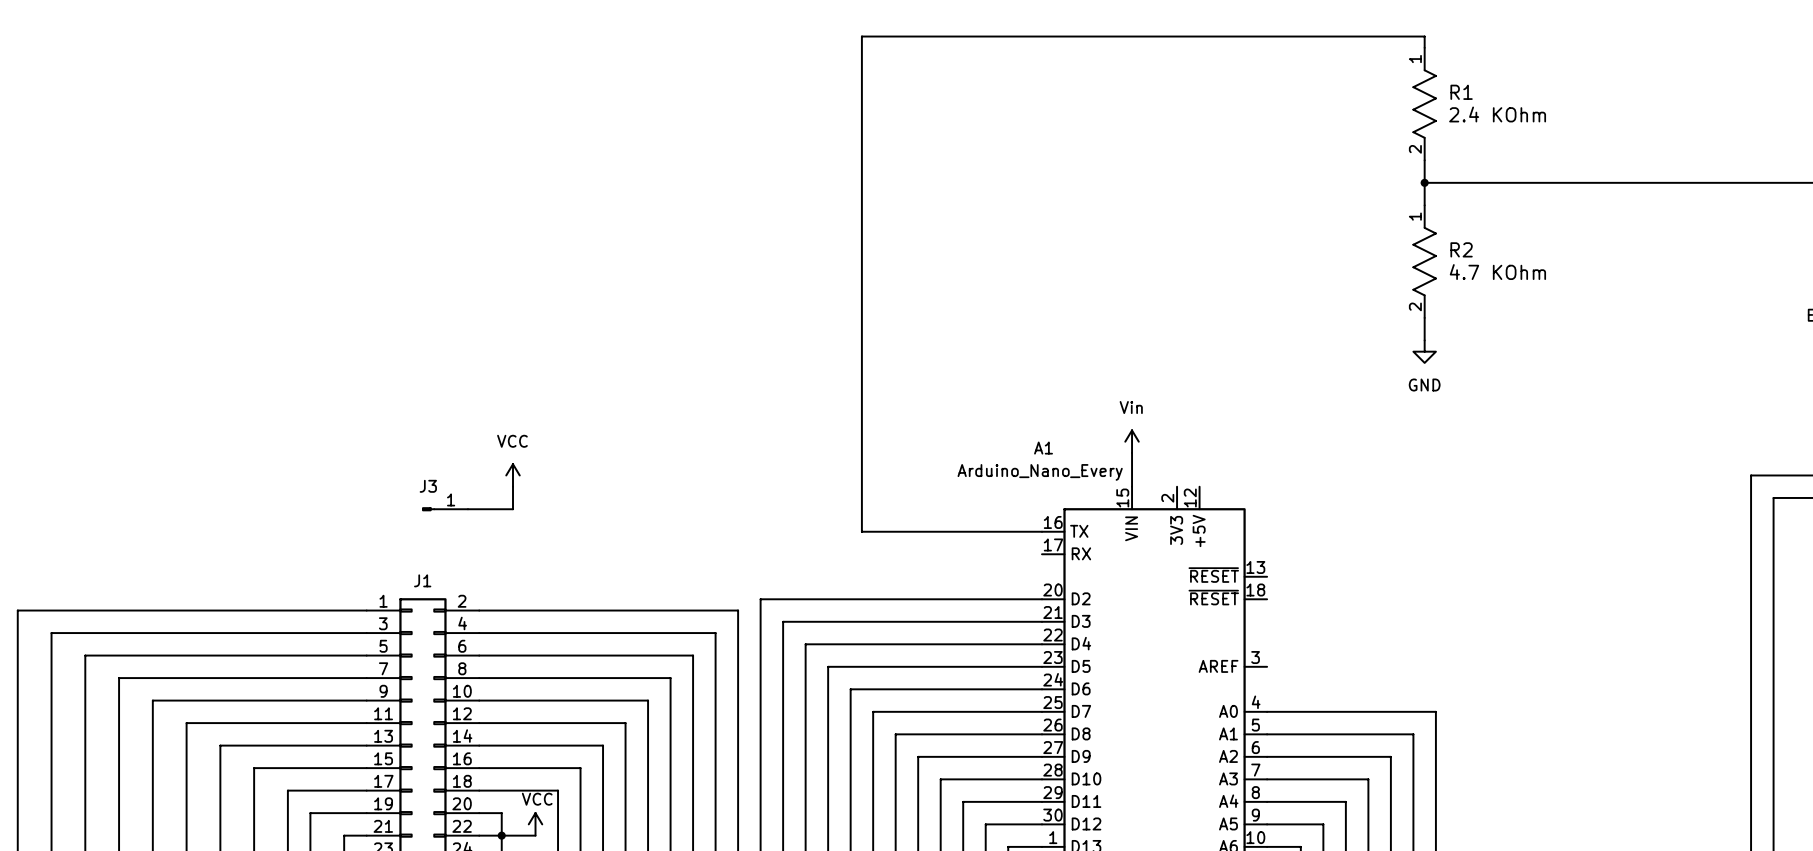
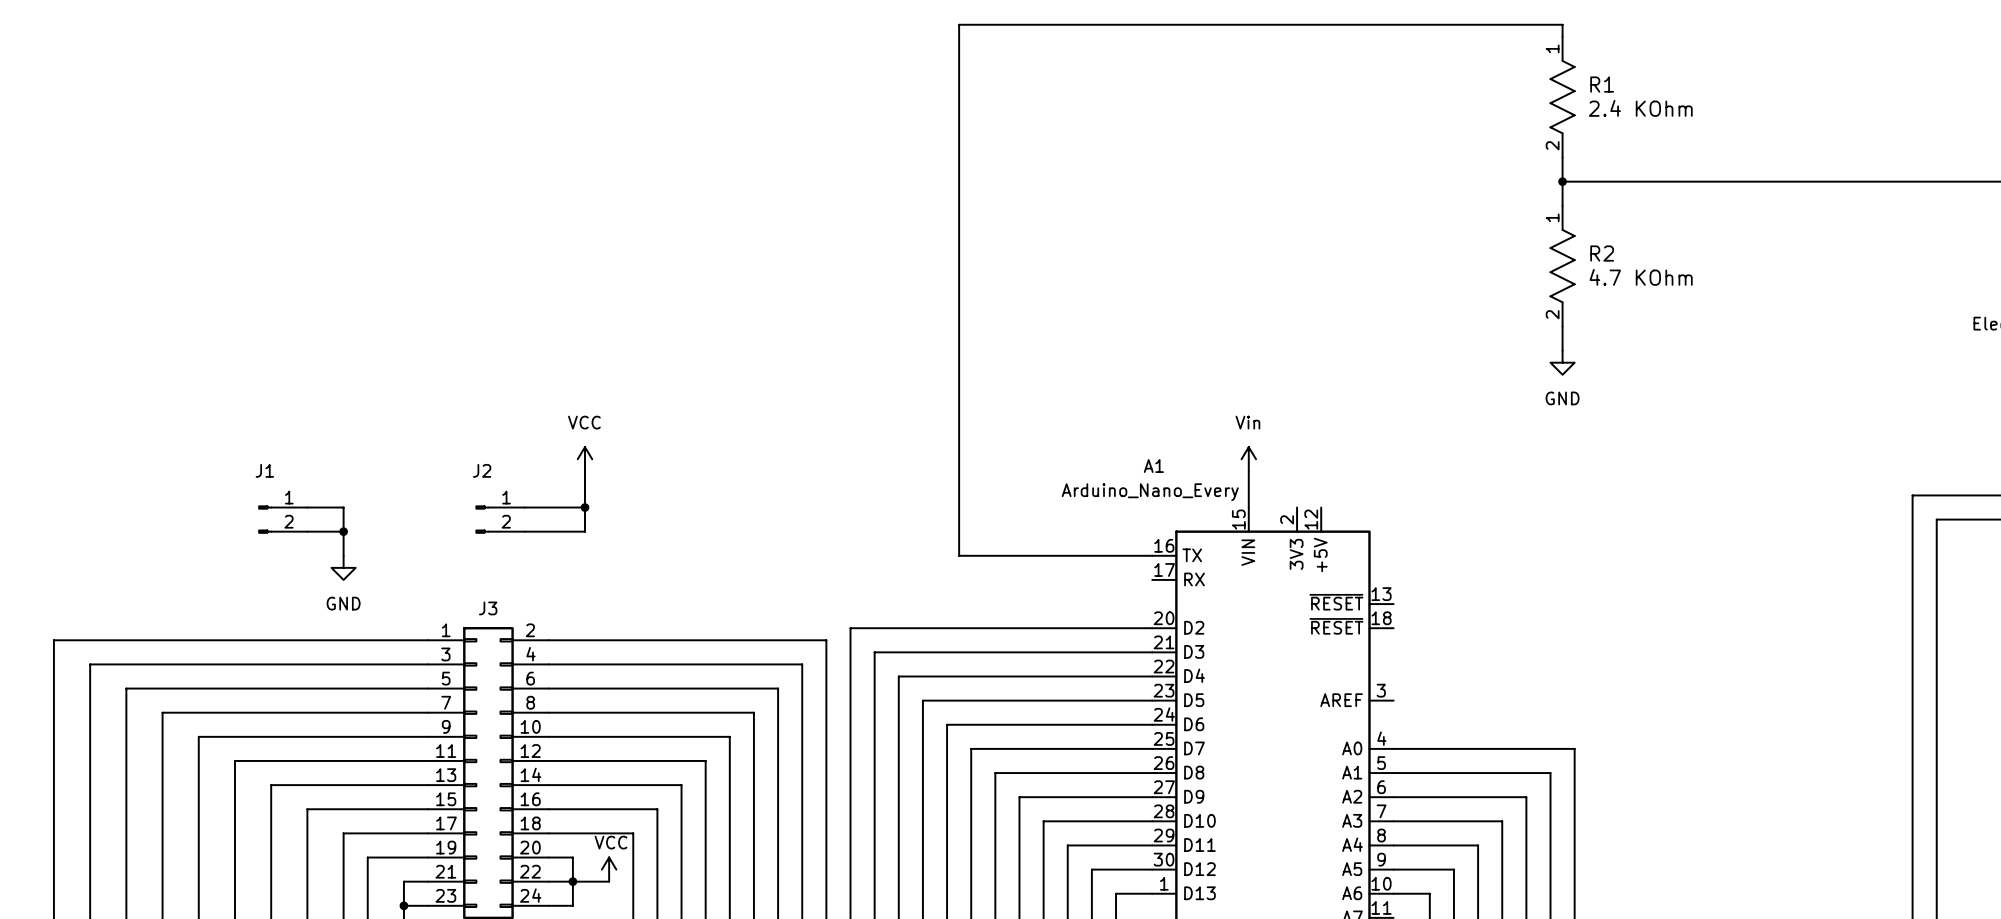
wire: none -> (584, 471) (584, 507) (524, 507)
power symbol position: VCC (513, 475) -> VCC (584, 459)
wire: none -> (307, 507) (343, 507) (343, 555)
junction: none -> (584, 507)
J1: none -> (282, 519)
J2: none -> (500, 519)
wire: none -> (307, 531) (343, 531)
junction: none -> (343, 531)
J3: (445, 509) -> none
power symbol: none -> GND (343, 567)
J1 name: J1 (422, 580) -> J3 (488, 608)

